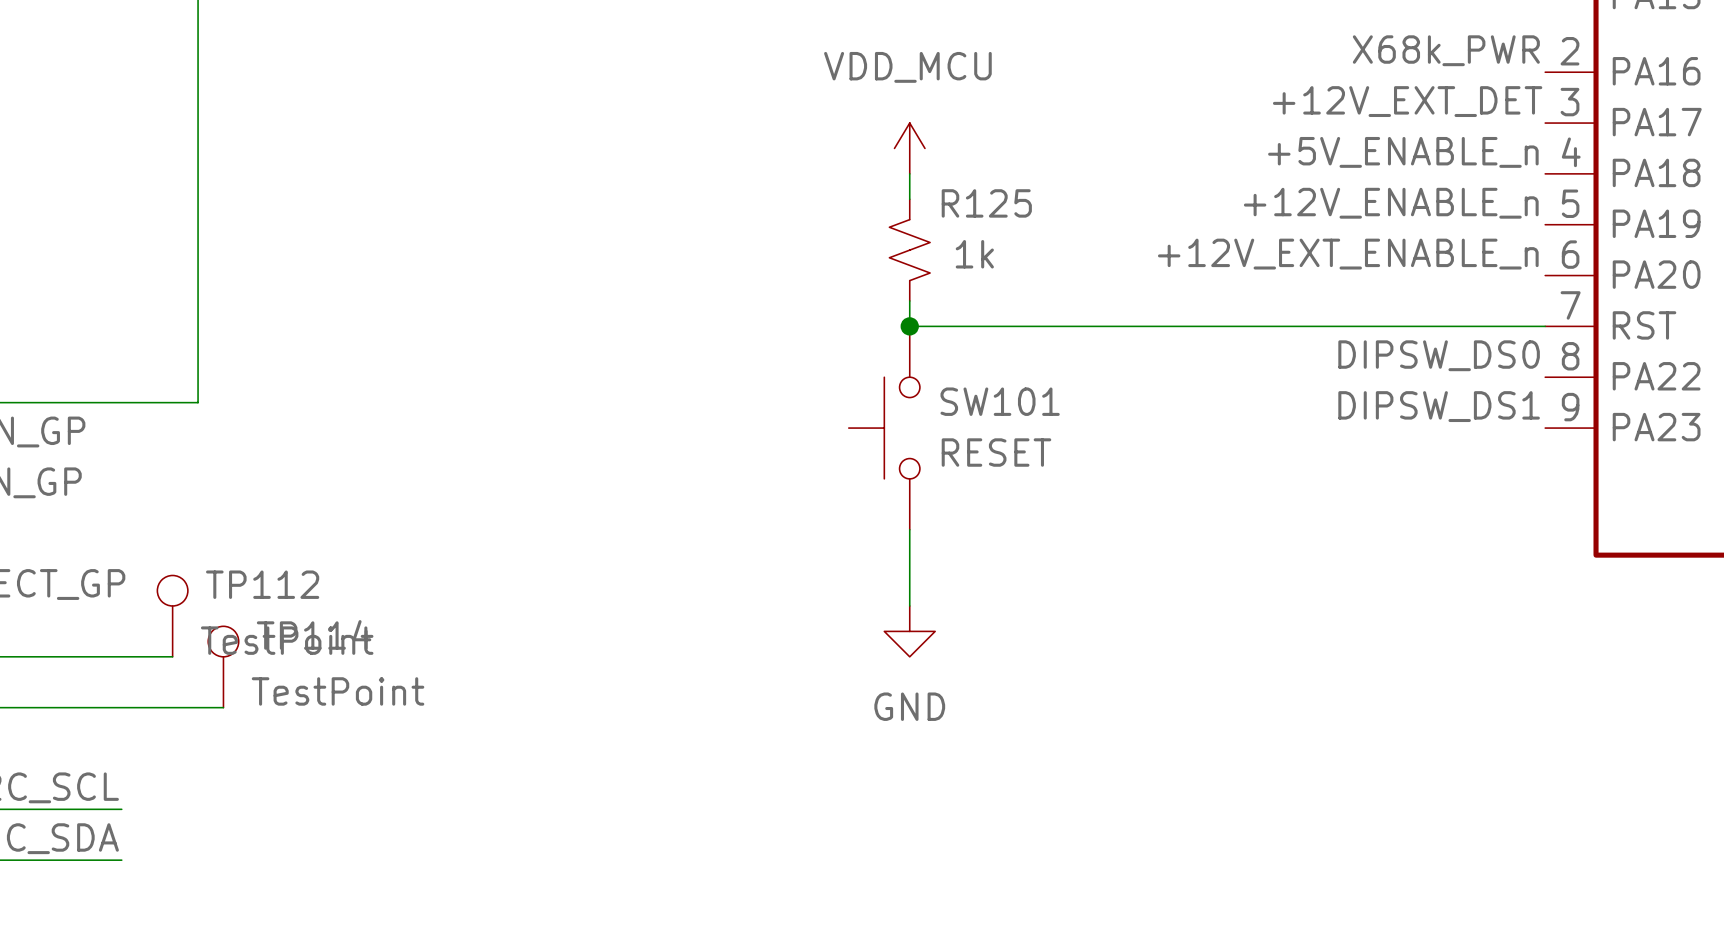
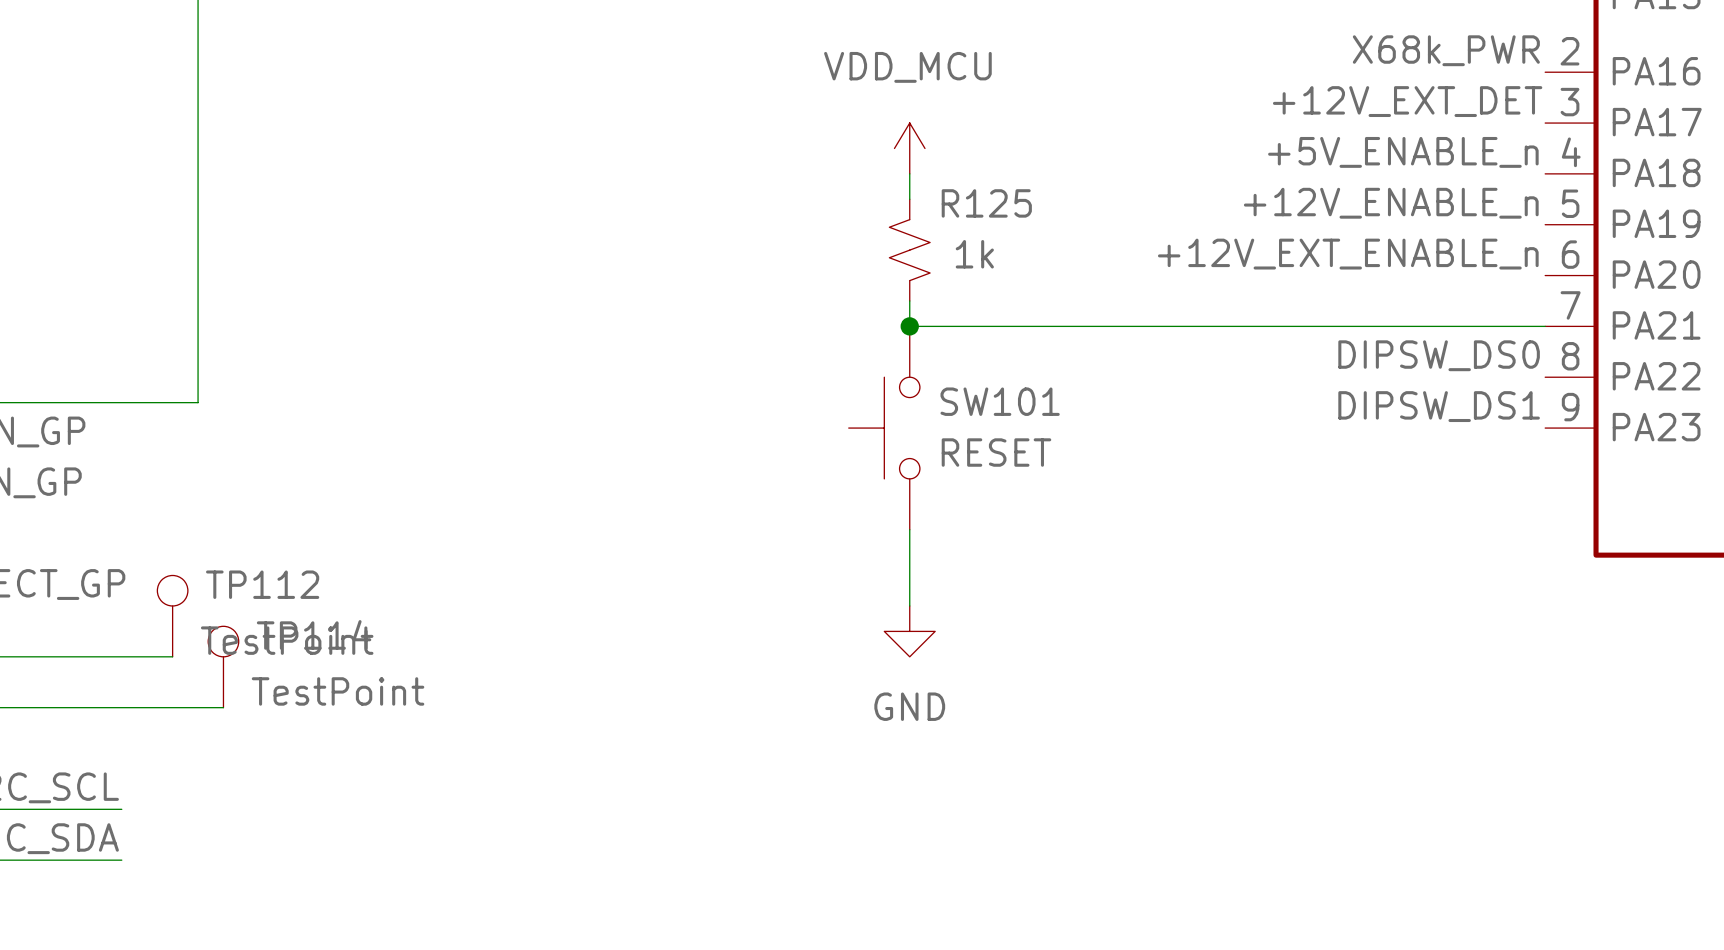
part pin name: RST (1644, 325) -> PA21 (1656, 325)

